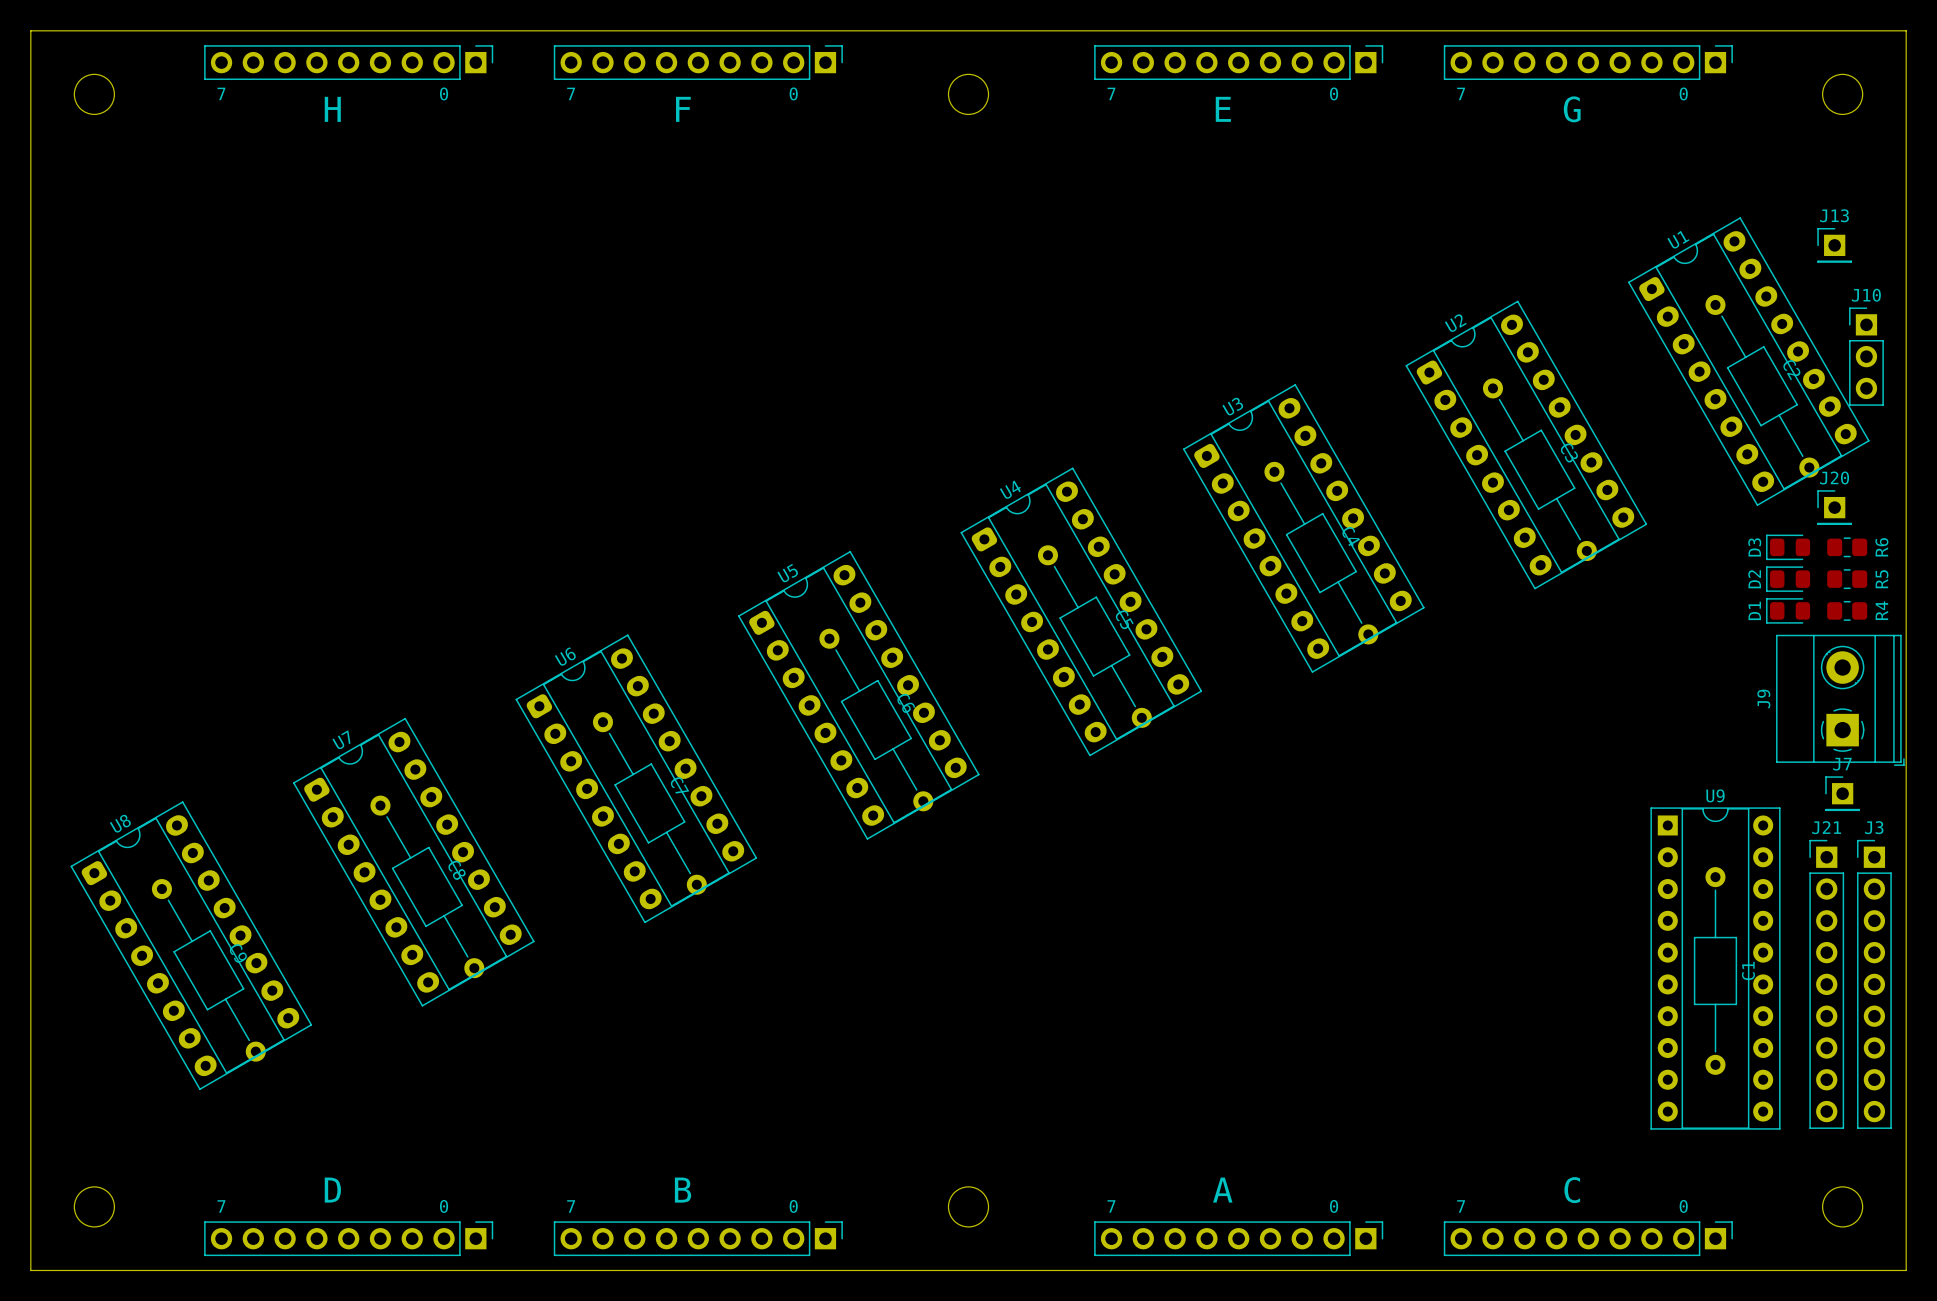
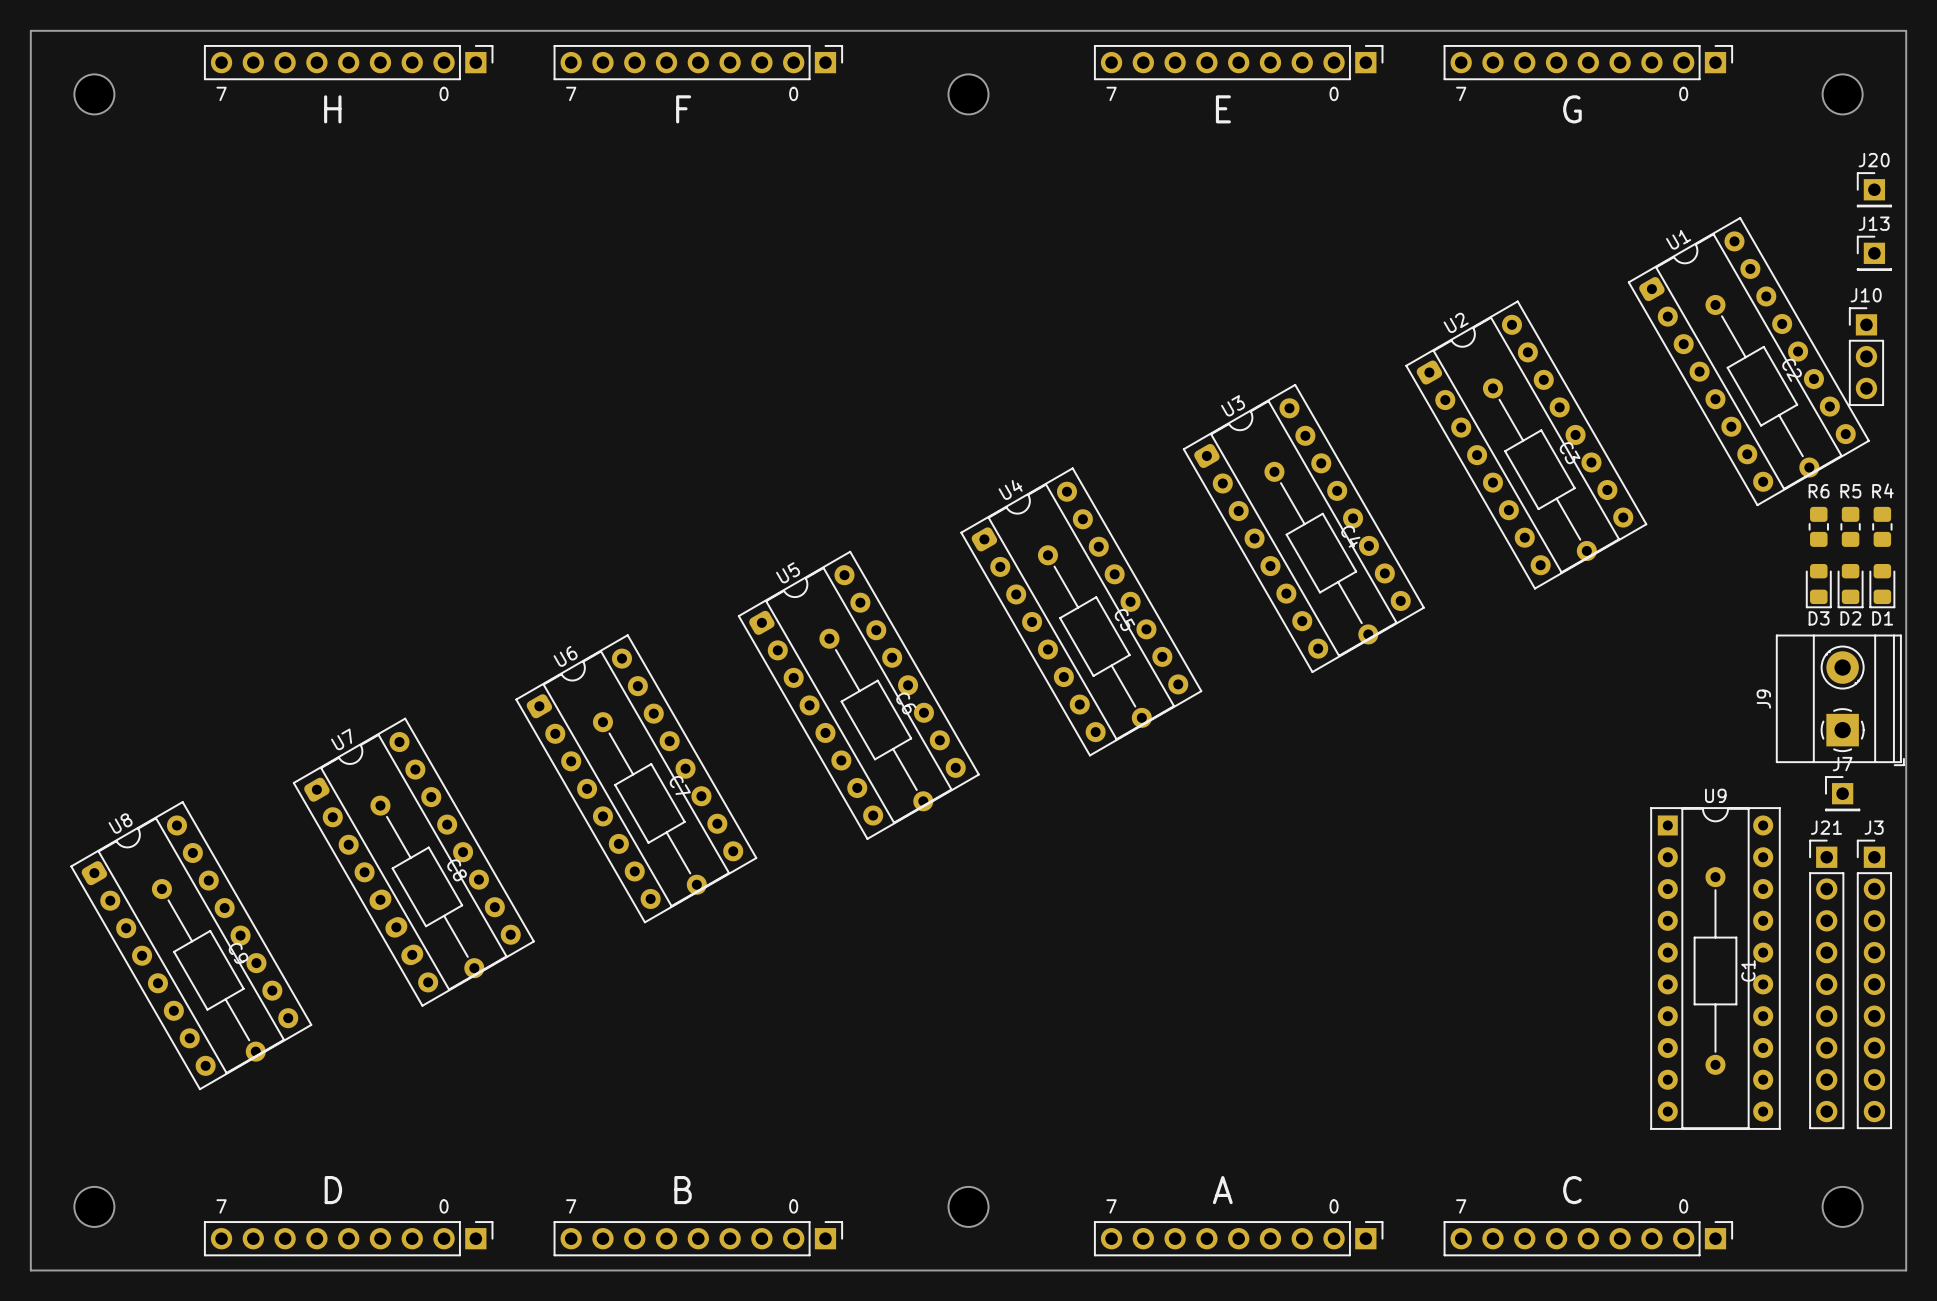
U1 footprint: [1628, 217, 1870, 506] -> [1628, 217, 1870, 506]
J13 position: (1834, 245) -> (1874, 253)
U2 footprint: [1405, 300, 1648, 590] -> [1405, 300, 1648, 590]
U3 footprint: [1183, 384, 1425, 673] -> [1183, 384, 1425, 673]
U4 footprint: [960, 467, 1203, 757] -> [960, 467, 1203, 757]
J20 position: (1834, 507) -> (1874, 189)
D3 rotation: 0° (1788, 547) -> 90° counterclockwise (1818, 586)
D3 position: (1788, 547) -> (1818, 586)
R6 rotation: 0° (1847, 547) -> 90° clockwise (1818, 526)
R6 position: (1847, 547) -> (1818, 526)
R6 name position: R6 (1881, 547) -> R6 (1819, 491)
U5 footprint: [738, 551, 980, 840] -> [738, 551, 980, 840]
D2 rotation: 0° (1788, 579) -> 90° counterclockwise (1850, 586)
D2 position: (1788, 579) -> (1850, 586)
R5 rotation: 0° (1847, 579) -> 90° clockwise (1850, 526)
R5 position: (1847, 579) -> (1850, 526)
R5 name position: R5 (1882, 579) -> R5 (1850, 491)
D1 rotation: 0° (1788, 610) -> 90° counterclockwise (1882, 586)
D1 position: (1788, 610) -> (1882, 586)
R4 rotation: 0° (1847, 610) -> 90° clockwise (1882, 526)
R4 position: (1847, 610) -> (1882, 526)
R4 name position: R4 (1881, 610) -> R4 (1882, 490)
U6 footprint: [515, 634, 758, 924] -> [515, 634, 758, 924]
U7 footprint: [293, 717, 535, 1007] -> [293, 717, 535, 1007]
U8 footprint: [70, 801, 313, 1090] -> [70, 801, 313, 1090]

